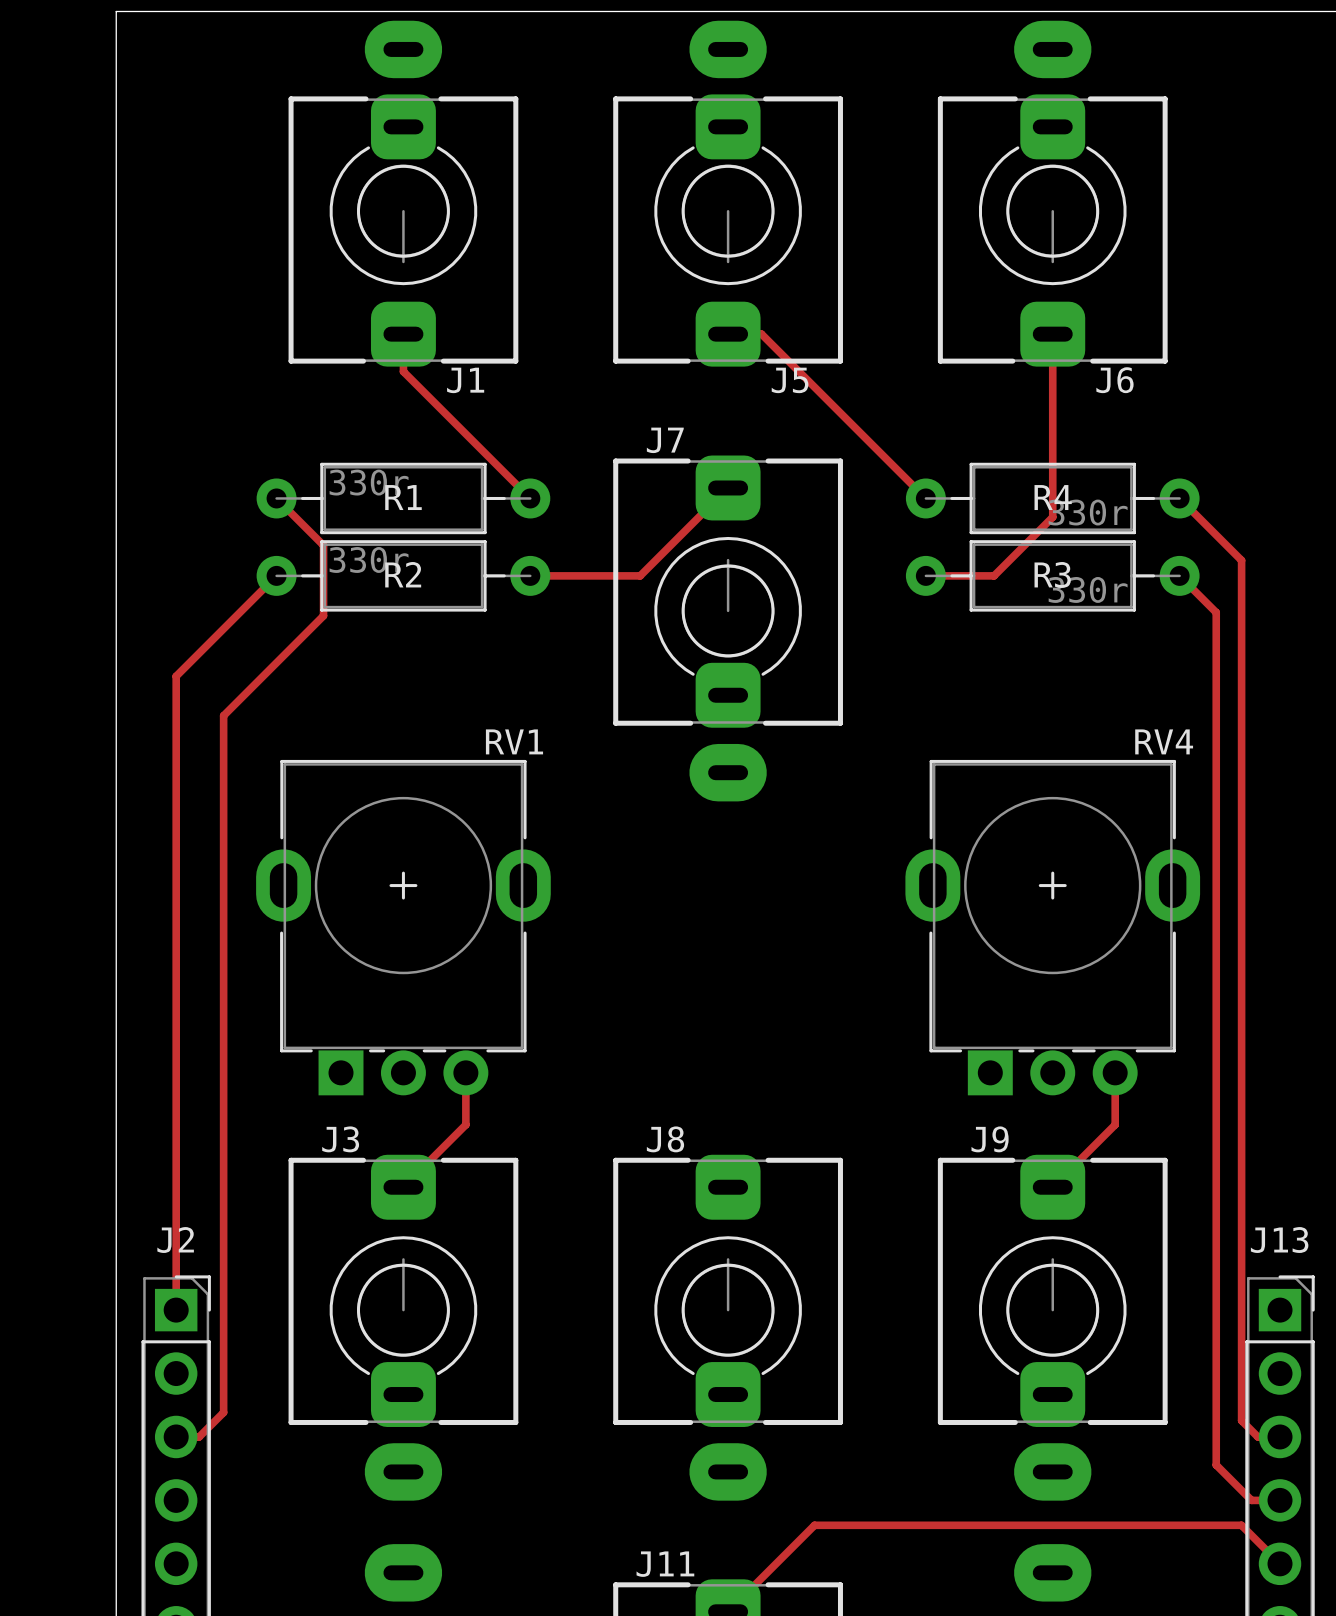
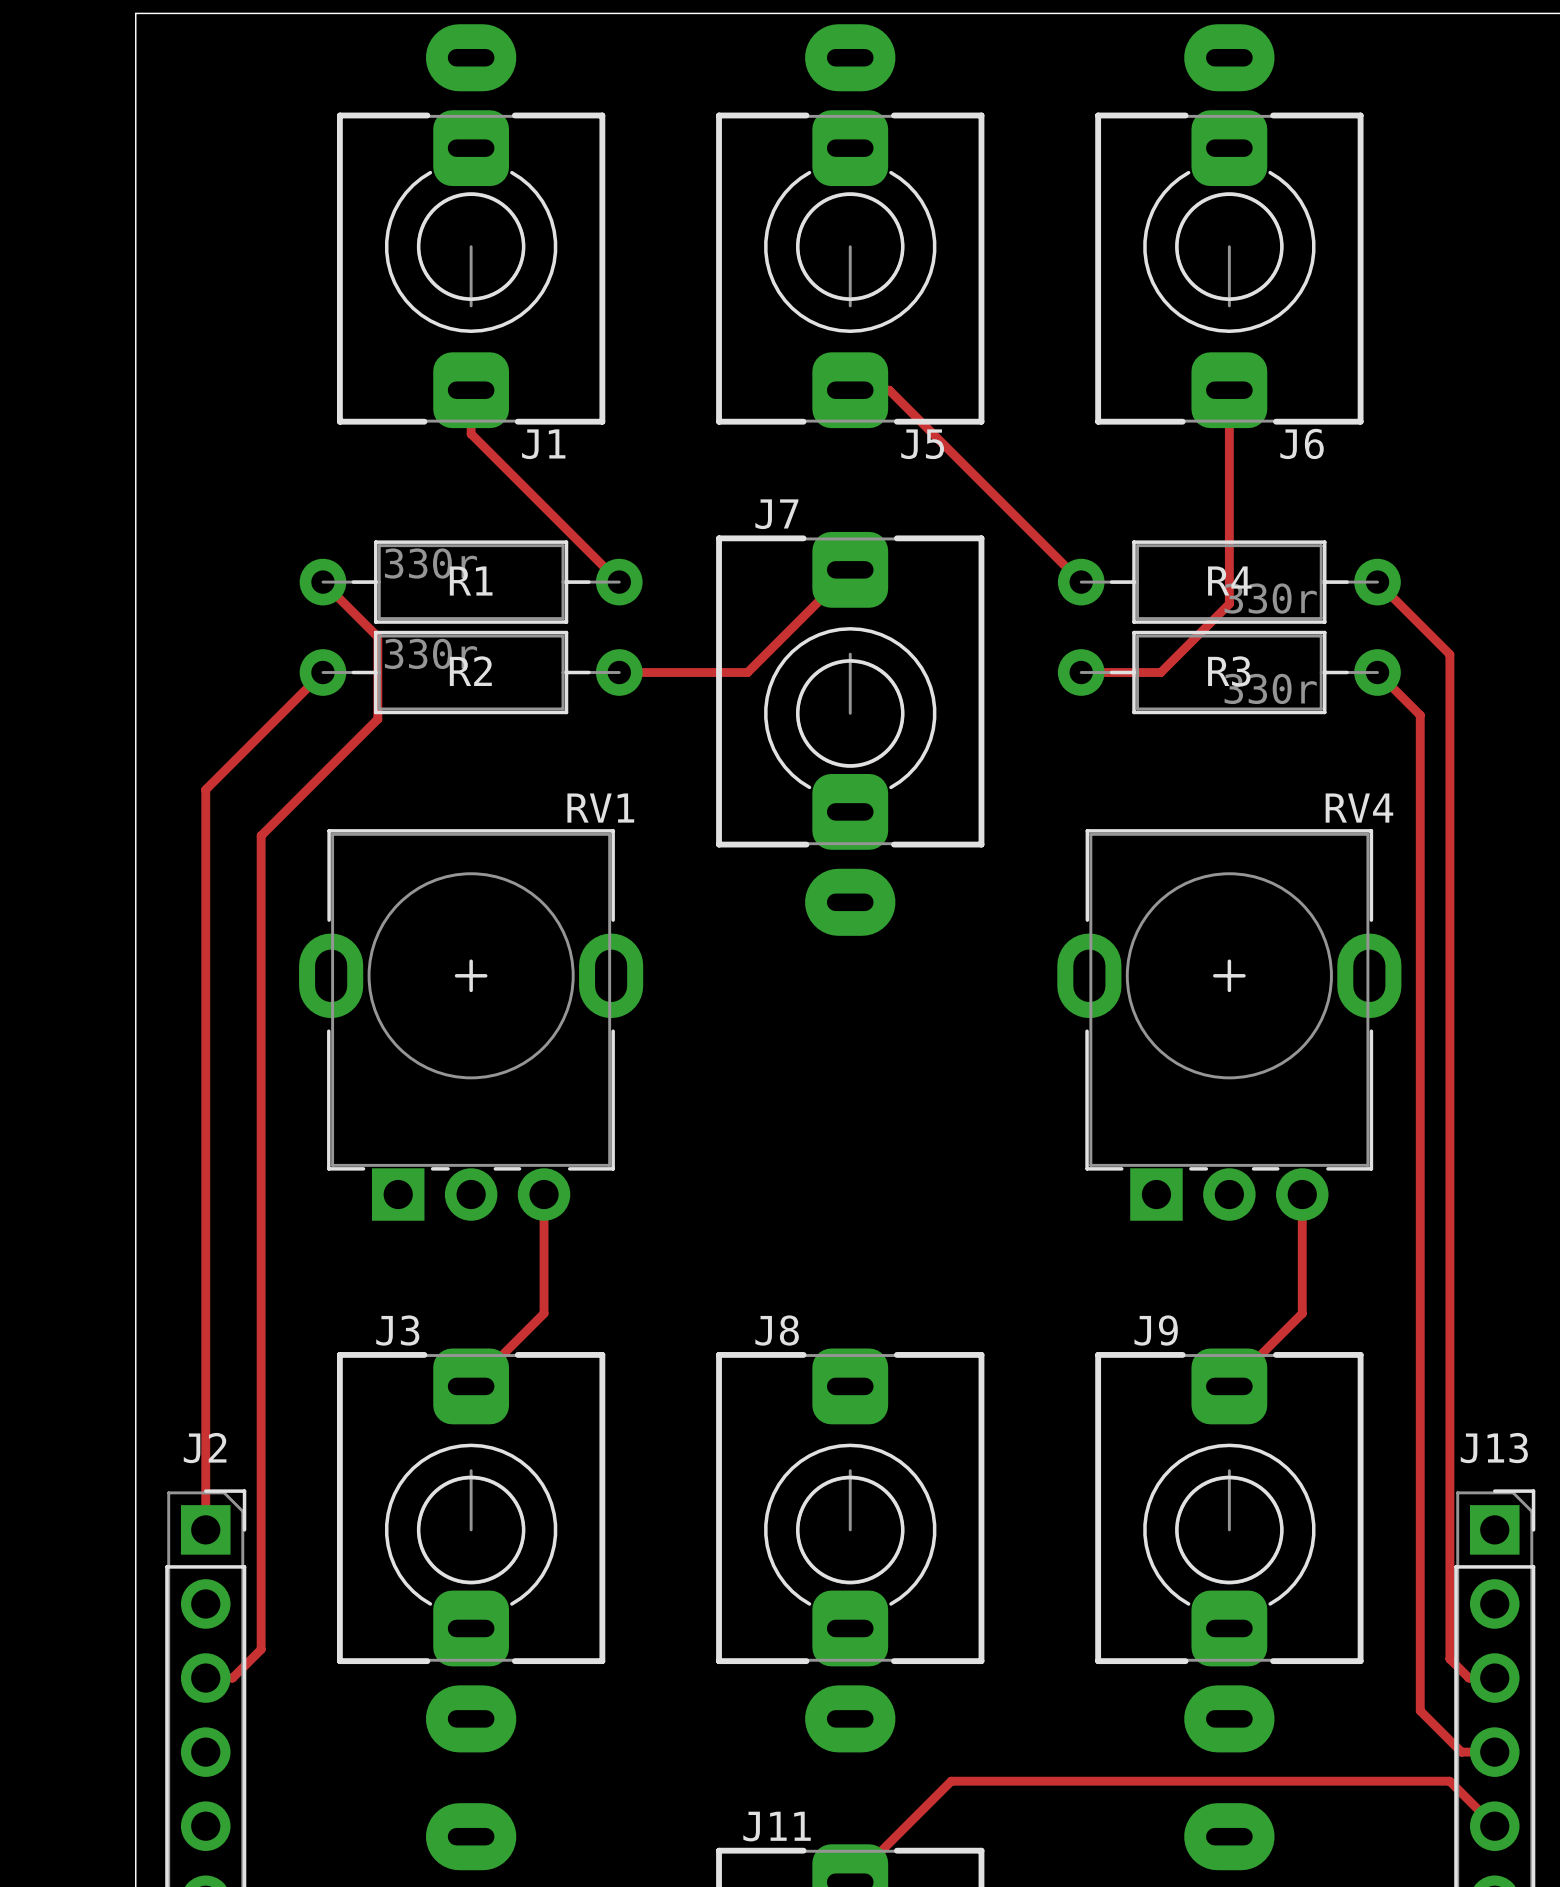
RV1 position: (403, 927) -> (471, 1024)
RV4 position: (1052, 927) -> (1229, 1024)
track: none -> (544, 1194) (544, 1252)
track: none -> (1302, 1194) (1302, 1252)

